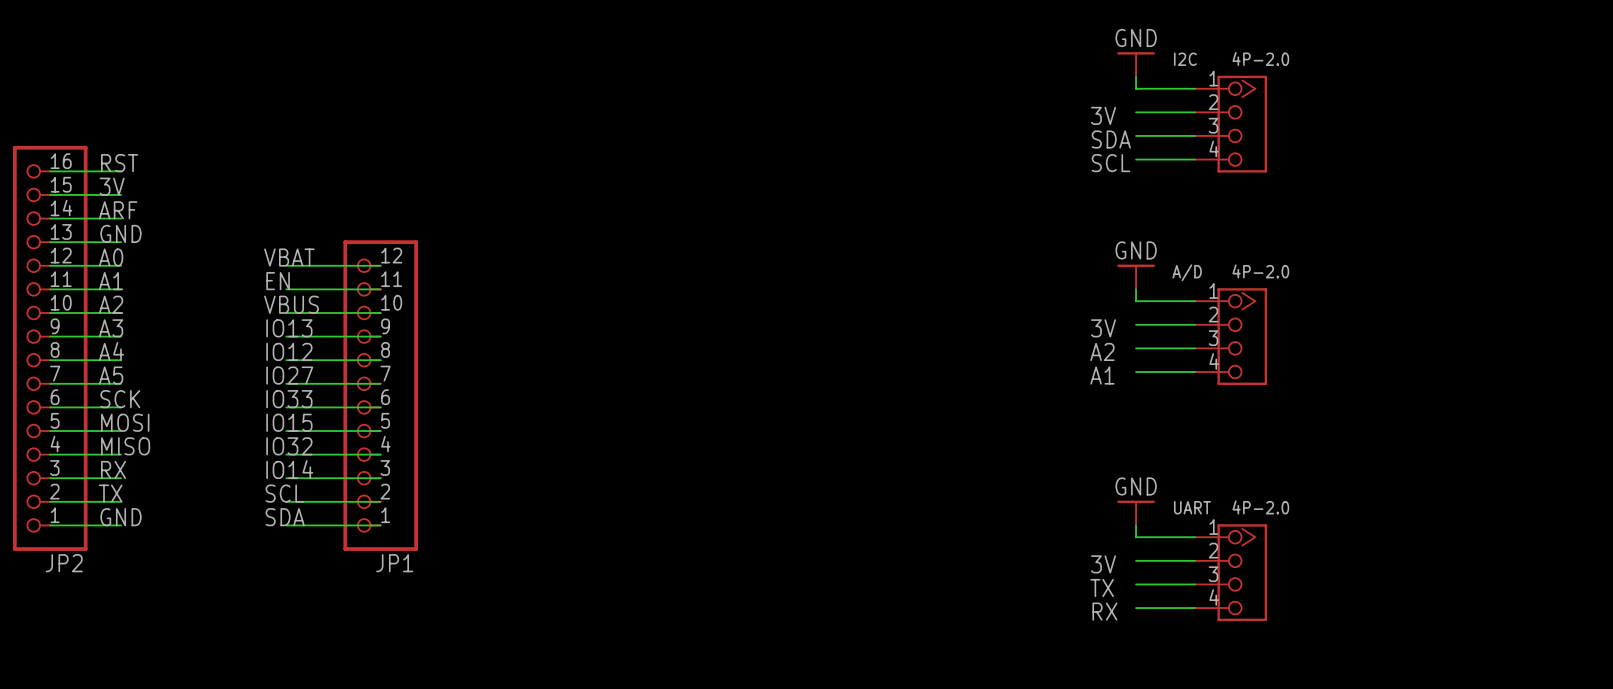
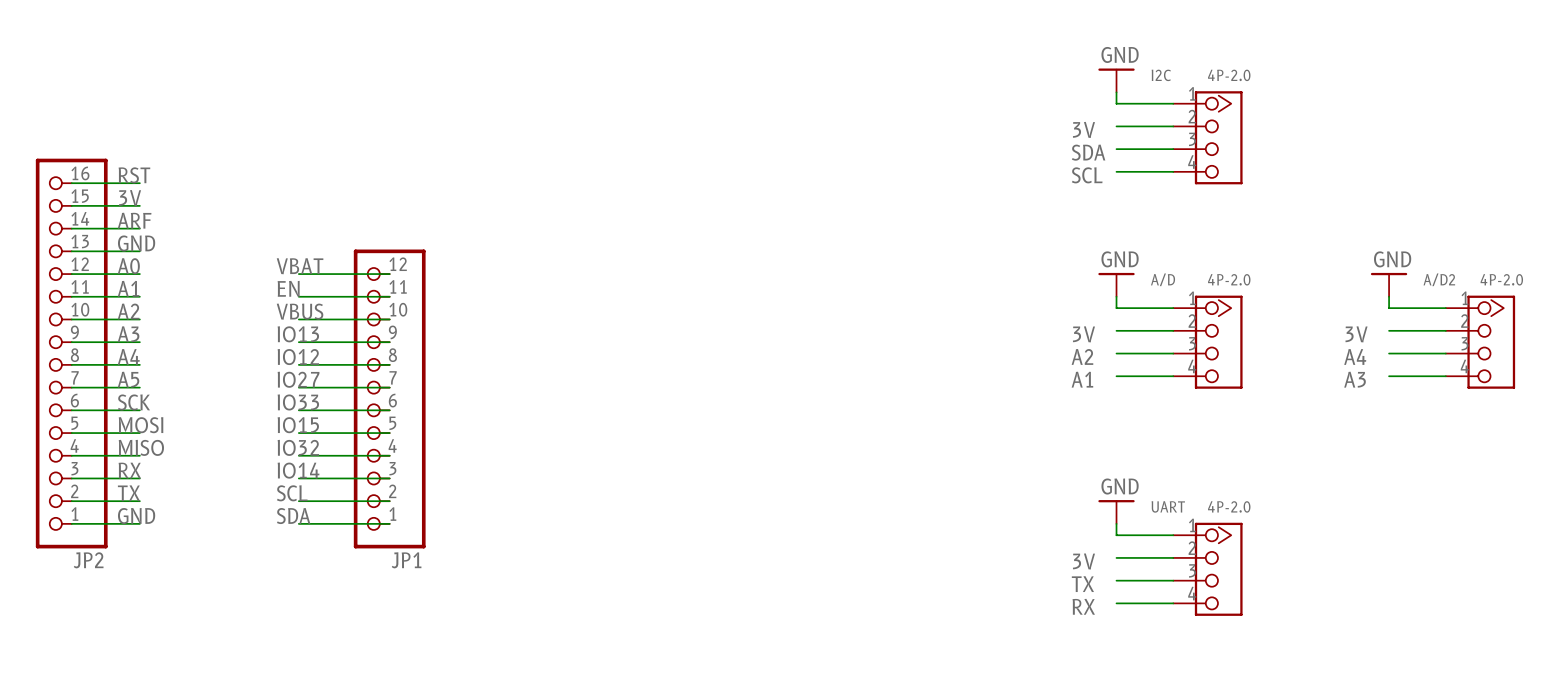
power symbol: none -> GND (1389, 284)
wire: none -> (1389, 296) (1389, 308) (1445, 308)
wire: none -> (1389, 330) (1445, 330)
label: none -> 3V (1356, 334)
A/D2: none -> 4P-2.0 (1480, 342)
wire: none -> (1389, 353) (1445, 353)
label: none -> A4 (1355, 356)
wire: none -> (1389, 376) (1445, 376)
label: none -> A3 (1355, 379)

